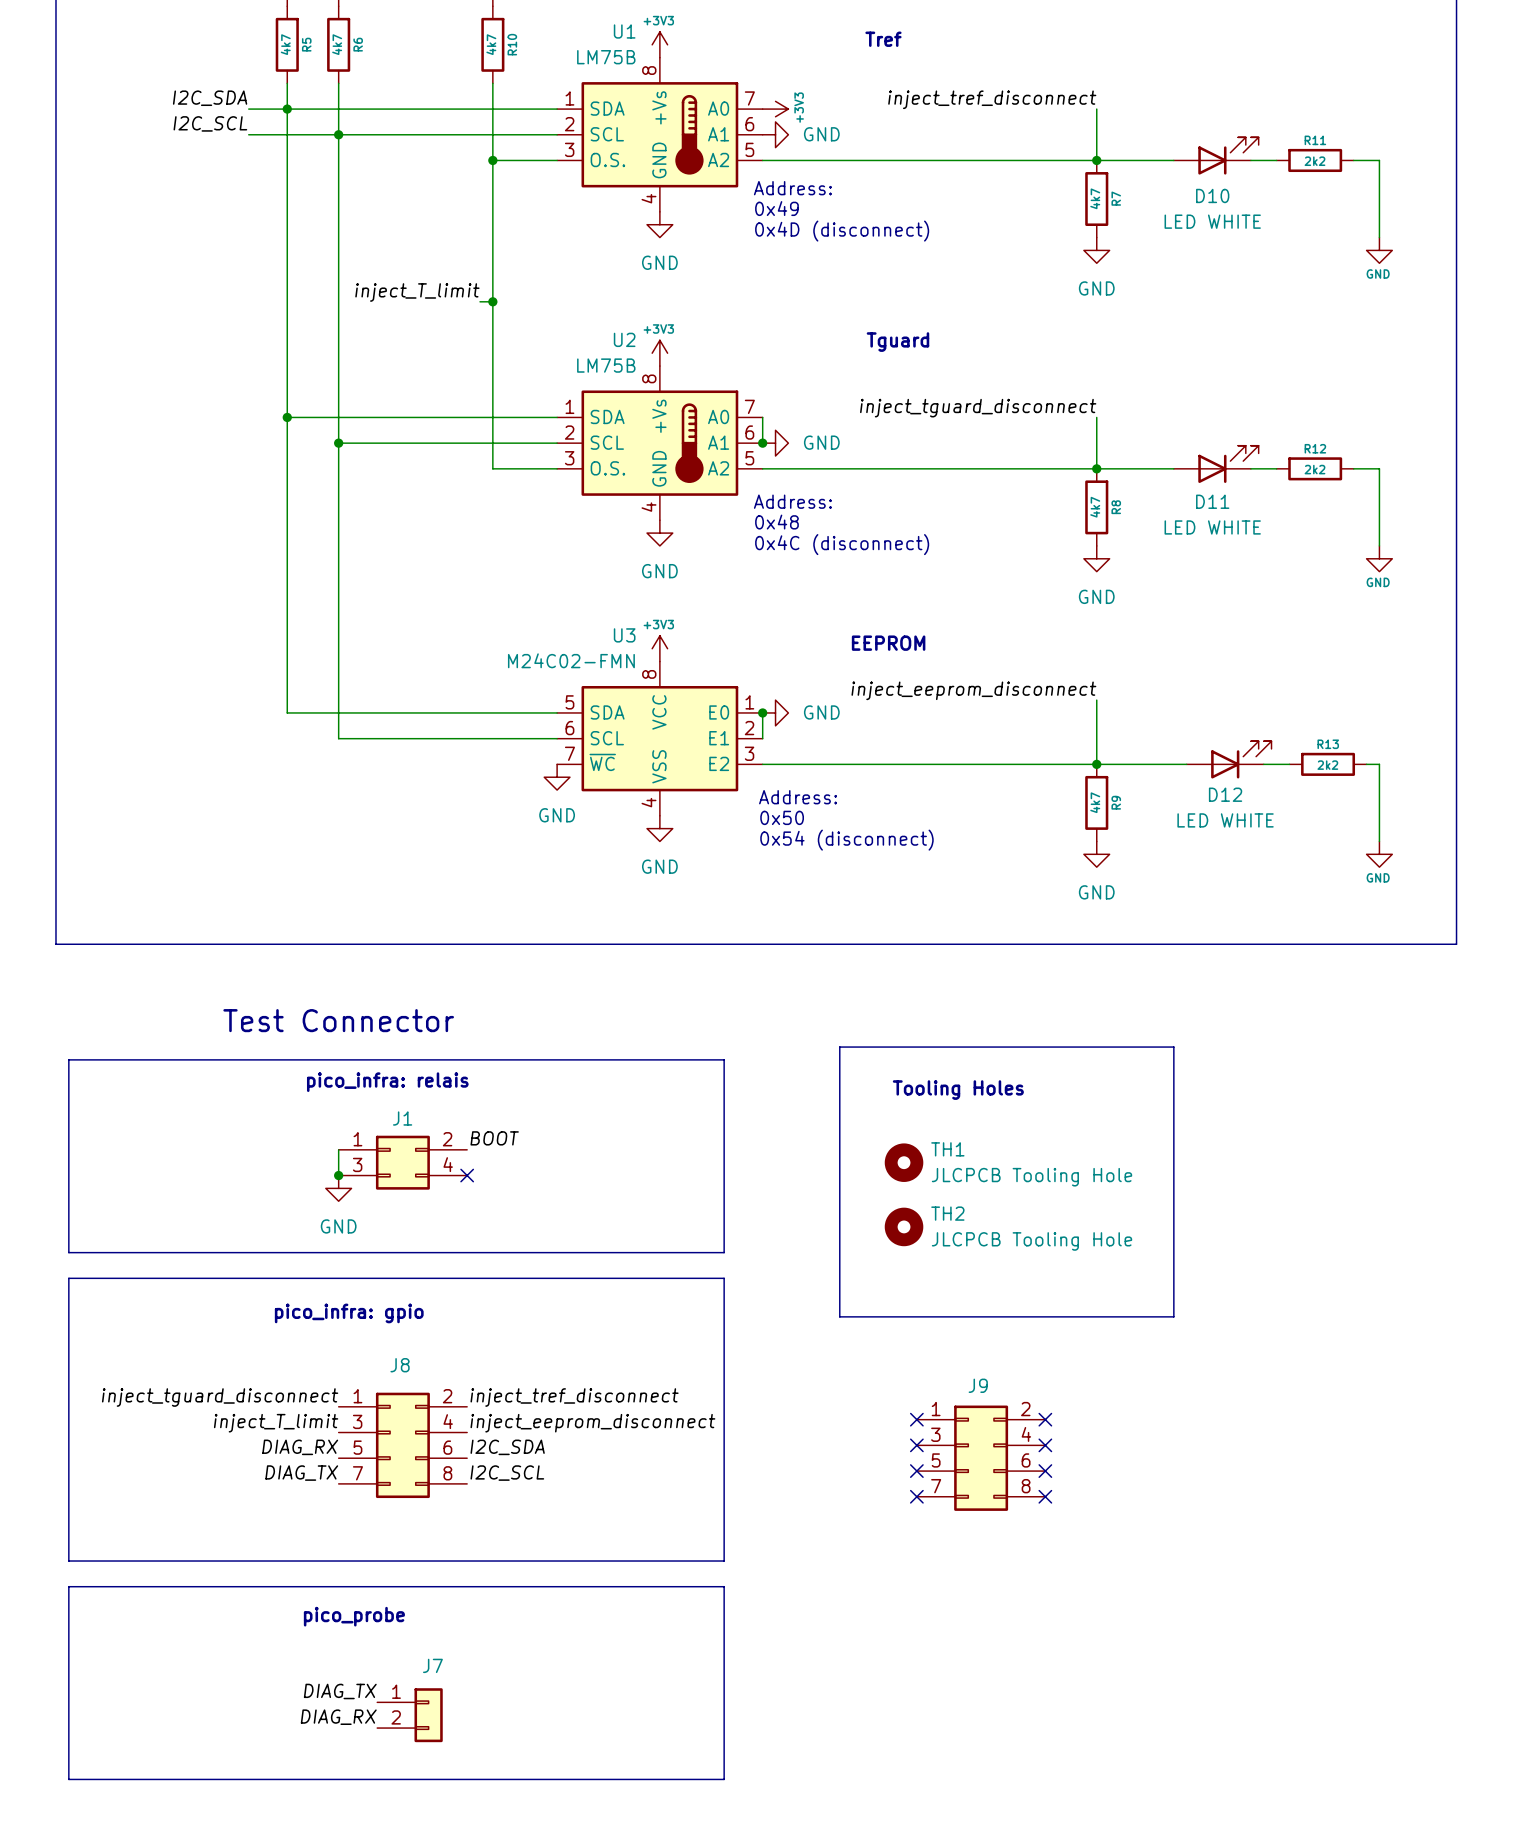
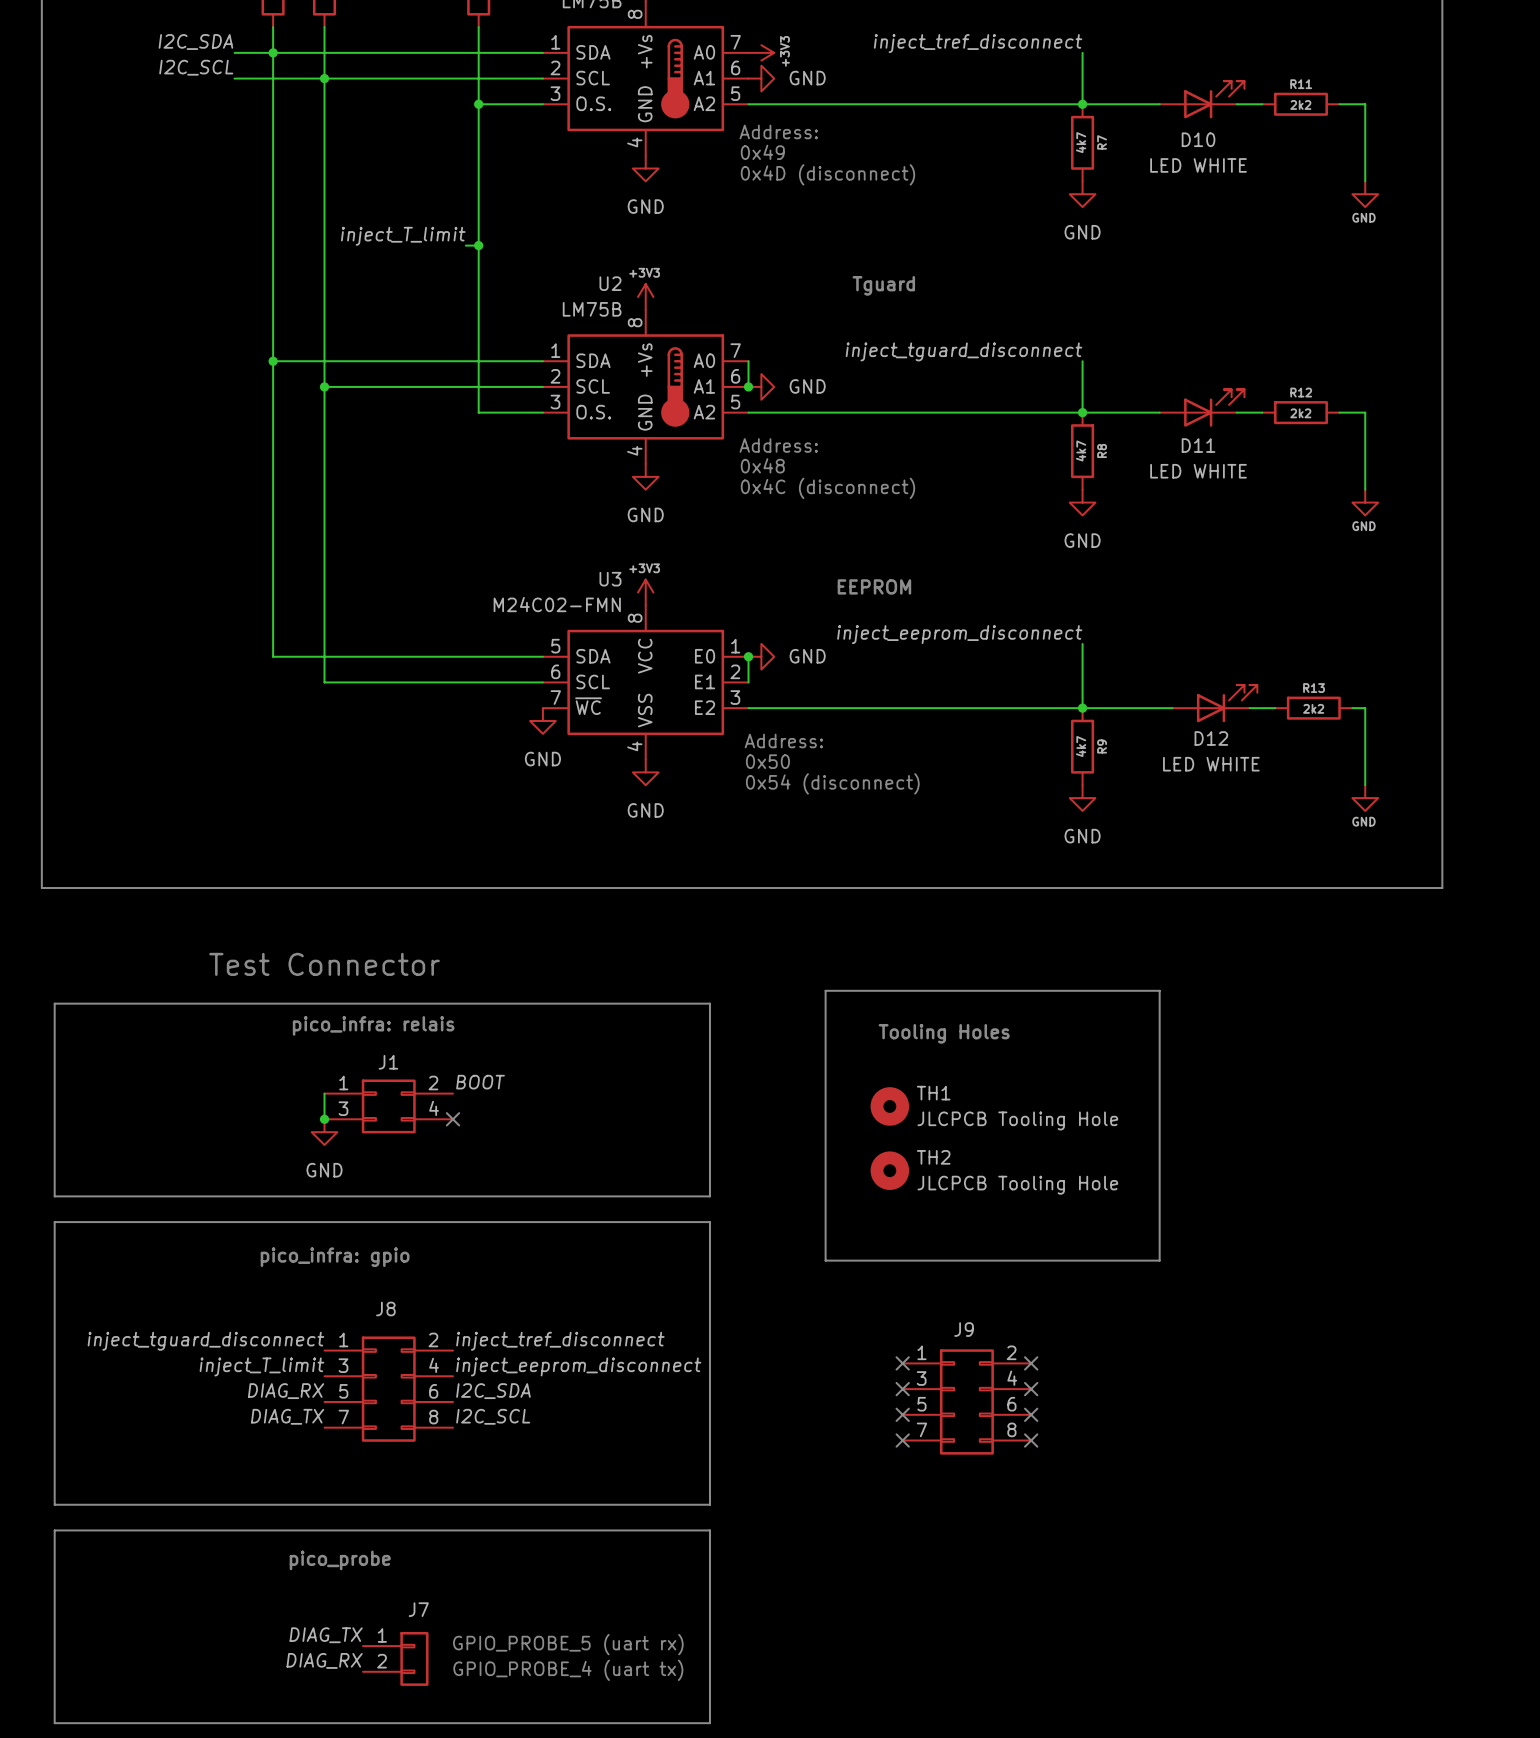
text: none -> GPIO_PROBE_5 (uart rx) (568, 1644)
text: none -> GPIO_PROBE_4 (uart tx) (568, 1670)

